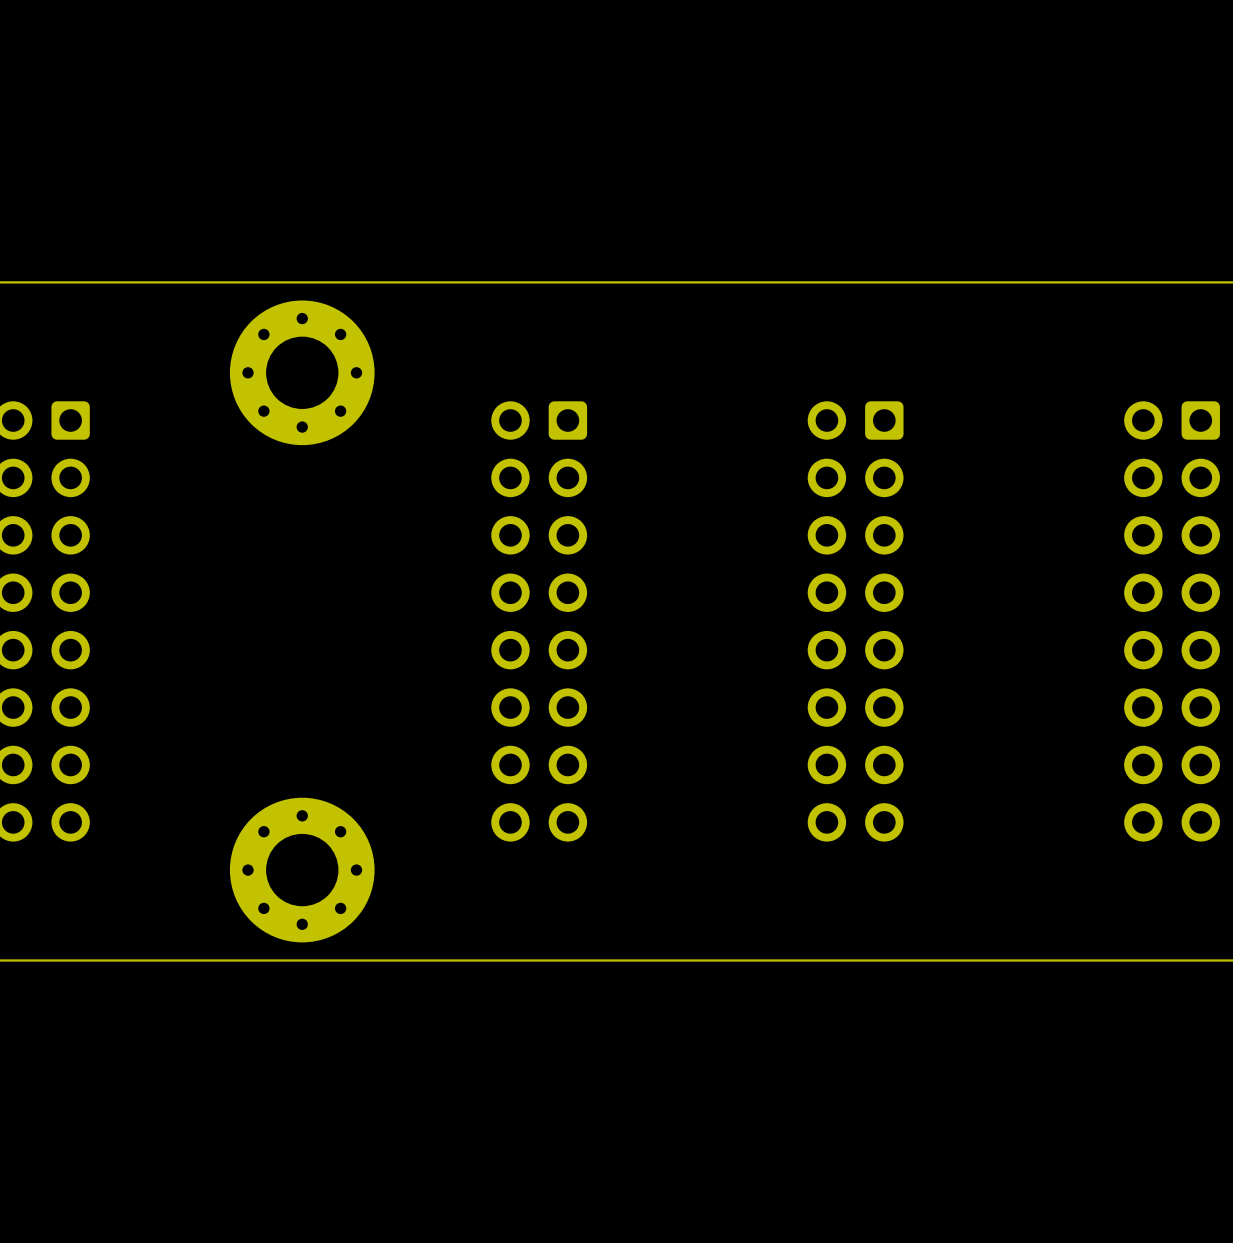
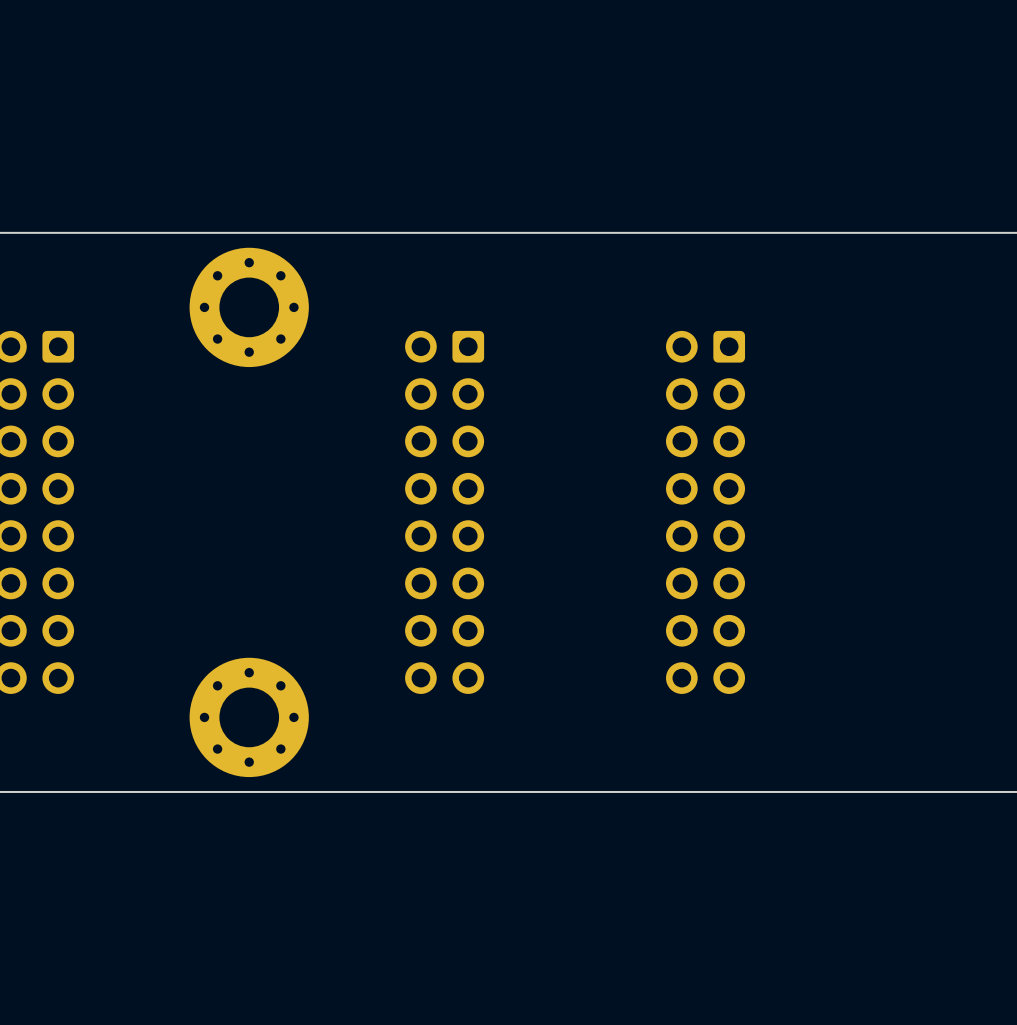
part: (1172, 621) -> none

